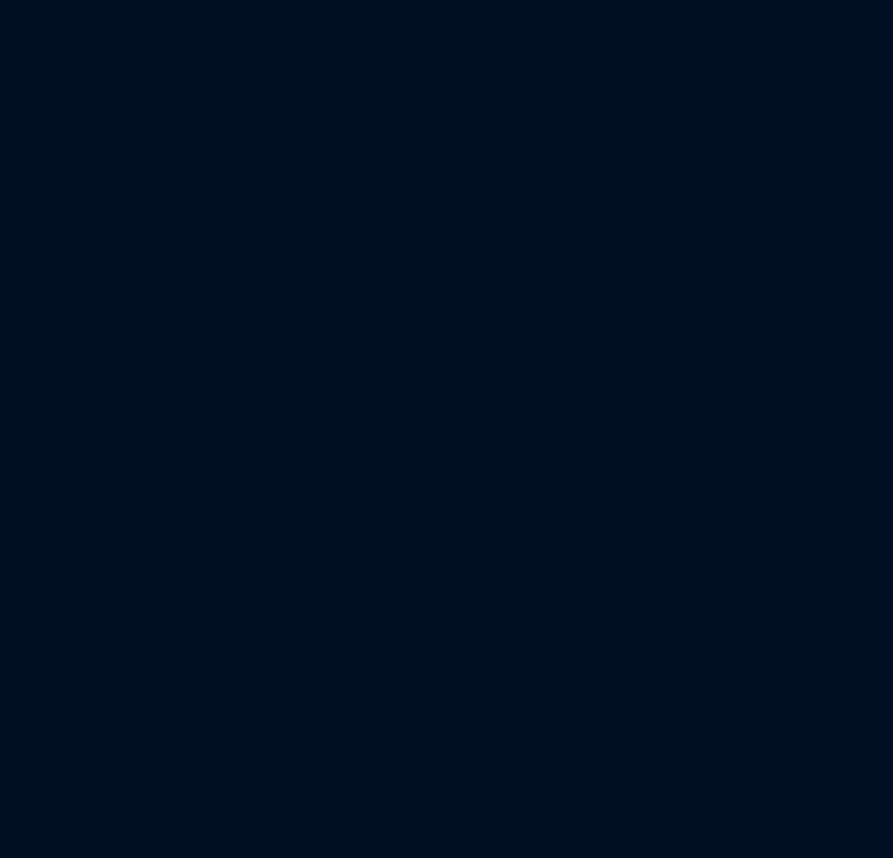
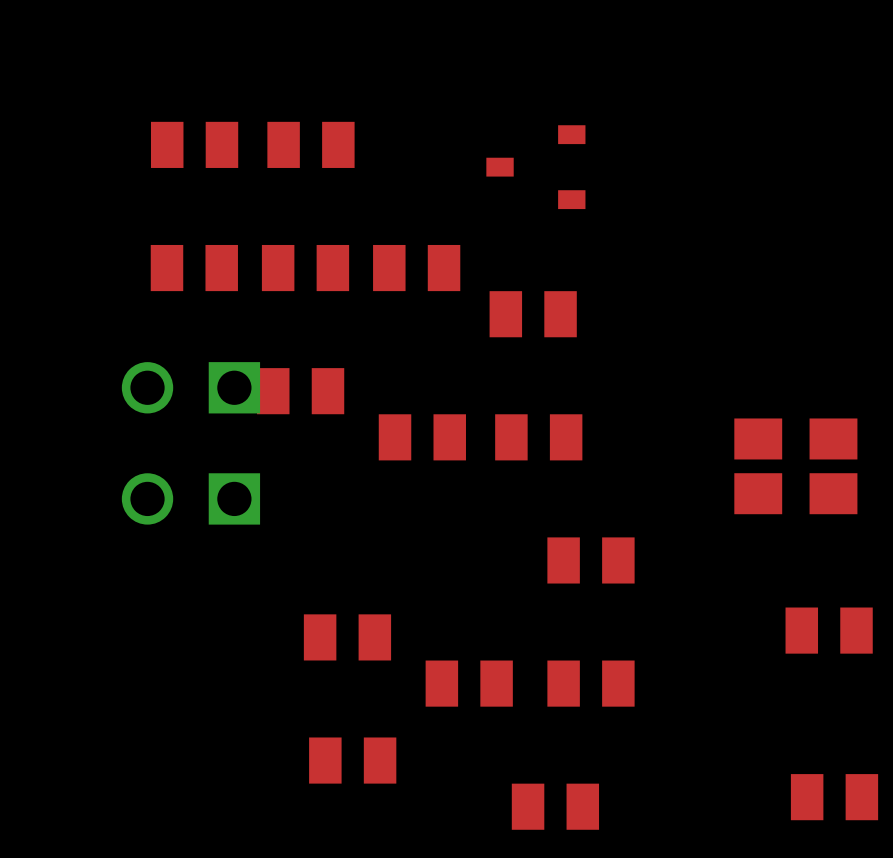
part: none -> (194, 144)
part: none -> (310, 144)
part: none -> (535, 167)
part: none -> (194, 268)
part: none -> (305, 268)
part: none -> (416, 268)
part: none -> (533, 314)
part: none -> (190, 387)
part: none -> (300, 391)
part: none -> (422, 437)
part: none -> (538, 437)
part: none -> (795, 466)
part: none -> (190, 498)
part: none -> (590, 560)
part: none -> (829, 630)
part: none -> (347, 637)
part: none -> (469, 683)
part: none -> (590, 683)
part: none -> (352, 760)
part: none -> (834, 797)
part: none -> (555, 806)

